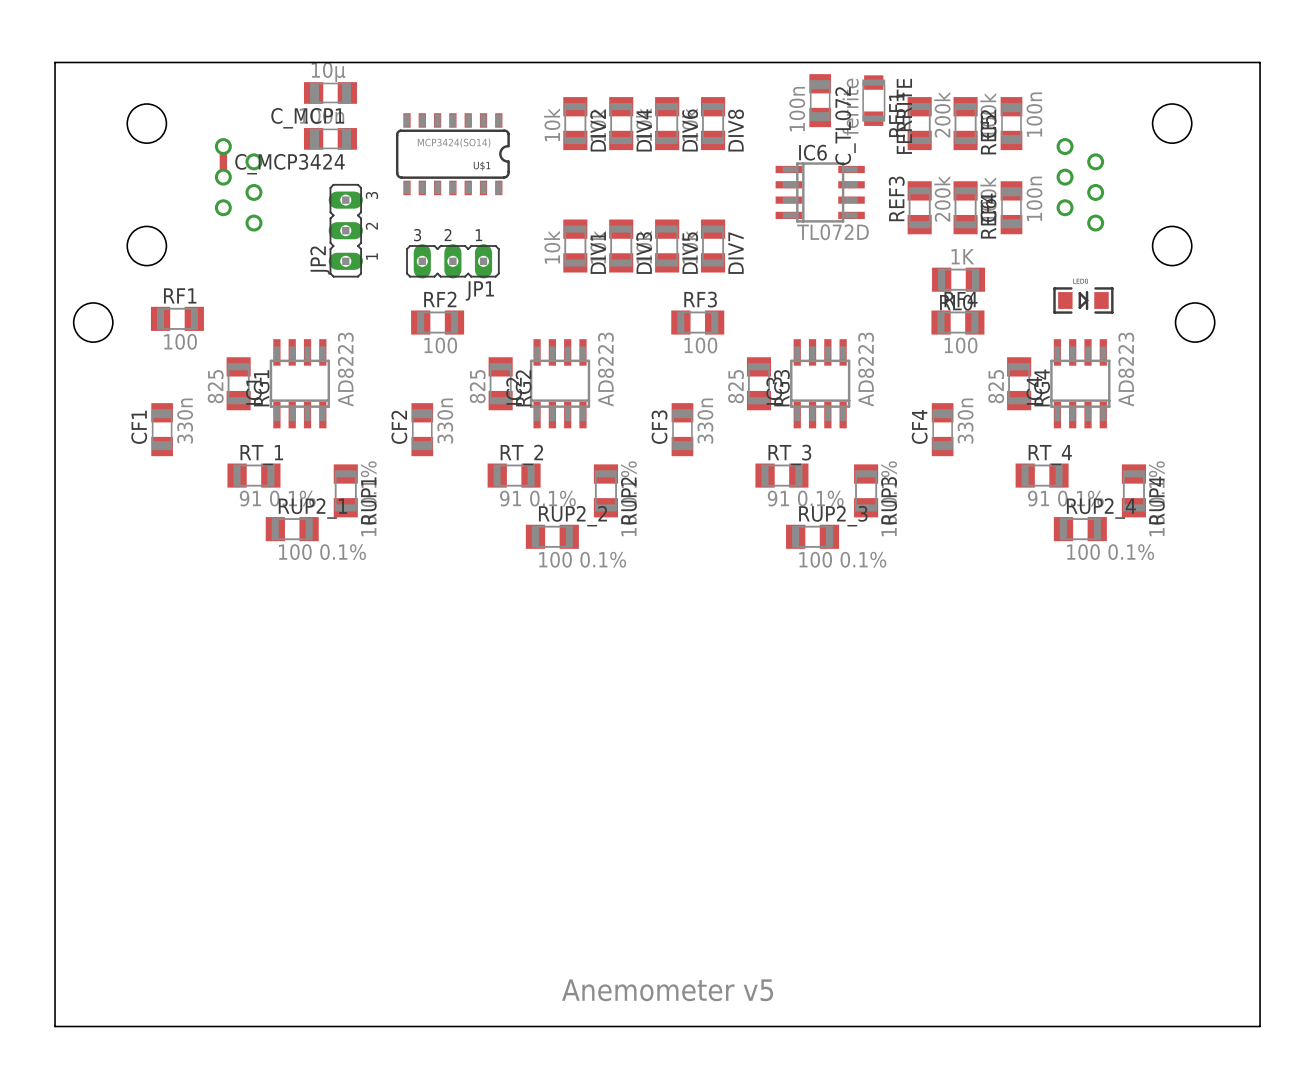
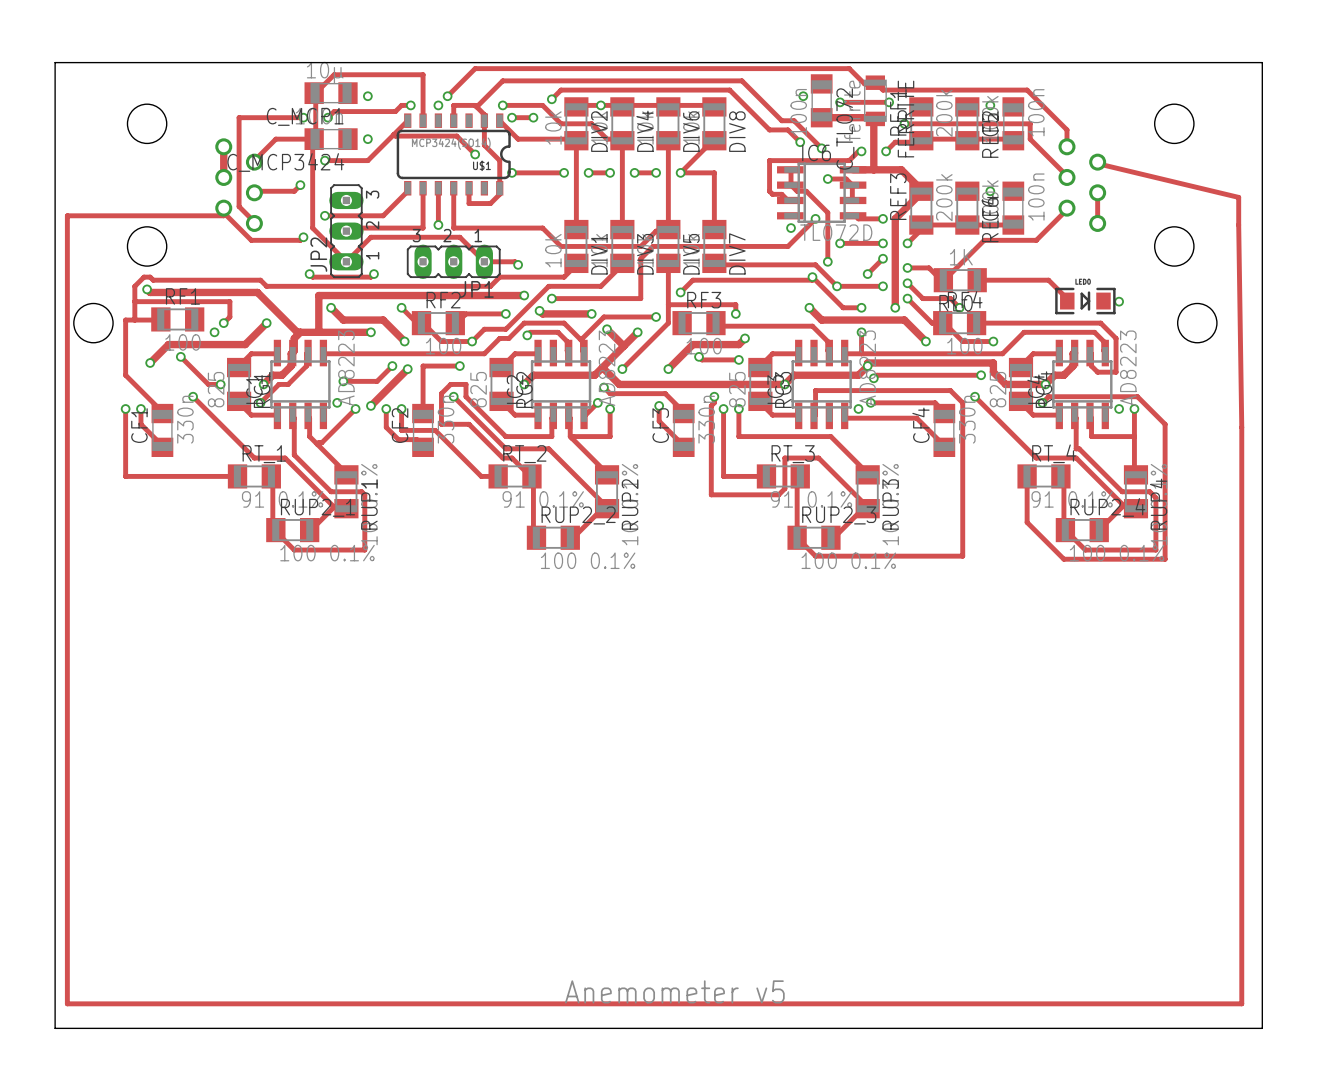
track: none -> (875, 82) (883, 90) (1027, 90) (1066, 129) (1066, 146)
track: none -> (867, 83) (864, 83) (849, 68) (475, 68) (447, 96)
via: none -> (367, 96)
via: none -> (447, 96)
via: none -> (803, 96)
track: none -> (551, 99) (561, 90) (729, 90) (769, 129) (787, 129) (800, 142)
via: none -> (551, 99)
track: none -> (840, 102) (889, 102)
via: none -> (840, 102)
via: none -> (889, 102)
track: none -> (410, 105) (401, 105) (395, 111) (334, 111) (328, 117)
via: none -> (410, 105)
via: none -> (438, 105)
track: none -> (502, 105) (542, 105) (561, 123) (591, 123) (607, 139) (622, 139) (622, 229)
via: none -> (502, 105)
via: none -> (600, 105)
via: none -> (990, 105)
track: none -> (476, 106) (502, 80) (741, 80) (781, 120) (794, 120) (821, 148)
track: none -> (576, 106) (714, 106)
track: none -> (303, 117) (239, 117) (239, 206) (254, 223)
via: none -> (303, 117)
via: none -> (328, 117)
track: none -> (511, 117) (533, 117)
via: none -> (511, 117)
via: none -> (533, 117)
track: none -> (821, 117) (875, 118) (873, 169)
track: none -> (407, 120) (367, 160) (324, 160)
track: none -> (423, 120) (423, 74) (334, 74) (314, 93) (315, 139) (275, 139) (254, 162)
track: none -> (453, 120) (453, 105) (475, 105) (484, 114) (484, 145) (499, 160) (499, 194) (490, 203) (469, 203) (469, 188)
track: none -> (499, 120) (518, 139) (576, 139) (576, 229)
track: none -> (904, 123) (1030, 123) (1030, 139) (1066, 177)
via: none -> (904, 123)
track: none -> (393, 134) (456, 136) (475, 154)
track: none -> (312, 139) (312, 228) (346, 261) (346, 258) (349, 258) (370, 237) (459, 237) (484, 261) (515, 261) (518, 264)
via: none -> (367, 139)
track: none -> (668, 140) (668, 231) (656, 231) (640, 246) (561, 246) (542, 228) (453, 228) (453, 188)
track: none -> (714, 140) (680, 172) (714, 172) (714, 229)
track: none -> (1013, 140) (1011, 139) (968, 139) (967, 140) (965, 139) (922, 139) (919, 142) (895, 142) (886, 151)
via: none -> (800, 142)
via: none -> (821, 148)
track: none -> (861, 151) (858, 151) (849, 160) (769, 160) (769, 191) (772, 194) (781, 194) (790, 200)
via: none -> (861, 151)
via: none -> (886, 151)
via: none -> (475, 154)
via: none -> (324, 160)
track: none -> (1097, 162) (1238, 197) (1241, 427) (1241, 1003) (67, 1003) (67, 215) (223, 215) (223, 208)
track: none -> (790, 169) (791, 185)
track: none -> (853, 169) (901, 169) (921, 191) (895, 218) (895, 307)
track: none -> (511, 172) (564, 172)
via: none -> (511, 172)
via: none -> (564, 172)
track: none -> (588, 172) (610, 172)
via: none -> (588, 172)
via: none -> (610, 172)
track: none -> (634, 172) (656, 172)
via: none -> (634, 172)
via: none -> (656, 172)
via: none -> (680, 172)
track: none -> (827, 179) (846, 179) (852, 185)
via: none -> (827, 179)
track: none -> (300, 185) (294, 191) (254, 191) (254, 192)
via: none -> (300, 185)
track: none -> (791, 185) (797, 191) (806, 191) (827, 212) (827, 261)
track: none -> (852, 185) (853, 200)
track: none -> (407, 188) (407, 191) (383, 215) (324, 215)
track: none -> (423, 188) (423, 228) (349, 228) (346, 231)
track: none -> (438, 188) (438, 225)
via: none -> (990, 191)
track: none -> (1097, 192) (1097, 223)
track: none -> (1066, 208) (1036, 240) (984, 240) (944, 280) (941, 280) (929, 267) (907, 267)
track: none -> (223, 212) (251, 240) (300, 240) (303, 237)
via: none -> (324, 215)
track: none -> (853, 215) (858, 218) (883, 218)
track: none -> (815, 218) (787, 246) (653, 246) (640, 258) (640, 298) (551, 298)
via: none -> (815, 218)
via: none -> (883, 218)
via: none -> (438, 225)
track: none -> (1013, 225) (921, 225) (922, 228) (907, 243)
via: none -> (791, 228)
via: none -> (303, 237)
track: none -> (840, 243) (883, 243)
via: none -> (840, 243)
via: none -> (883, 243)
via: none -> (907, 243)
track: none -> (883, 258) (867, 274)
via: none -> (883, 258)
via: none -> (827, 261)
track: none -> (576, 263) (564, 277) (499, 277) (490, 286) (266, 286) (260, 280) (153, 280) (150, 277) (144, 277) (134, 286) (134, 320)
track: none -> (622, 263) (600, 286) (548, 286) (505, 329) (484, 329) (472, 341) (441, 341) (423, 323) (416, 323) (401, 307)
track: none -> (668, 263) (668, 323) (622, 369)
track: none -> (714, 263) (815, 264) (837, 286) (883, 286)
via: none -> (518, 264)
via: none -> (907, 267)
track: none -> (309, 274) (312, 277) (370, 277) (374, 274)
via: none -> (309, 274)
via: none -> (374, 274)
via: none -> (867, 274)
via: none -> (812, 277)
track: none -> (977, 280) (1048, 280) (1067, 301)
track: none -> (907, 283) (922, 298) (950, 298) (959, 307)
via: none -> (907, 283)
via: none -> (837, 286)
via: none -> (883, 286)
track: none -> (147, 289) (150, 292) (257, 292) (297, 332) (370, 332)
via: none -> (147, 289)
track: none -> (680, 292) (692, 280) (812, 280) (812, 277) (843, 307) (861, 307)
via: none -> (680, 292)
track: none -> (524, 295) (318, 295) (318, 332)
via: none -> (524, 295)
via: none -> (551, 298)
track: none -> (907, 298) (932, 323) (944, 323) (962, 341) (993, 341)
via: none -> (907, 298)
track: none -> (134, 301) (229, 301) (229, 316) (223, 323)
via: none -> (1119, 301)
track: none -> (668, 304) (735, 304) (735, 313)
track: none -> (331, 307) (343, 320) (383, 320) (404, 341)
via: none -> (331, 307)
via: none -> (401, 307)
track: none -> (809, 307) (821, 320) (904, 320) (925, 341)
via: none -> (809, 307)
via: none -> (861, 307)
via: none -> (895, 307)
via: none -> (959, 307)
track: none -> (539, 310) (542, 313) (591, 313)
via: none -> (539, 310)
track: none -> (505, 313) (465, 313) (455, 323)
via: none -> (505, 313)
via: none -> (591, 313)
via: none -> (735, 313)
track: none -> (656, 316) (603, 316) (580, 339)
via: none -> (656, 316)
track: none -> (160, 319) (125, 320) (125, 375) (162, 413)
via: none -> (223, 323)
track: none -> (266, 323) (245, 344) (168, 344) (150, 362)
via: none -> (266, 323)
track: none -> (715, 323) (720, 326) (812, 326) (827, 341) (829, 353)
track: none -> (976, 323) (1100, 323) (1116, 338) (1116, 372) (1097, 372) (1091, 366) (1089, 353)
track: none -> (607, 329) (623, 346)
via: none -> (607, 329)
via: none -> (214, 332)
track: none -> (300, 332) (294, 338) (291, 366) (282, 375) (272, 375) (263, 384)
via: none -> (370, 332)
track: none -> (637, 332) (594, 375) (533, 375) (524, 384)
via: none -> (637, 332)
track: none -> (861, 332) (861, 353)
via: none -> (861, 332)
track: none -> (527, 335) (530, 332) (557, 332) (567, 341) (568, 353)
via: none -> (527, 335)
track: none -> (745, 338) (738, 344) (692, 344) (668, 369)
via: none -> (745, 338)
via: none -> (404, 341)
via: none -> (472, 341)
via: none -> (925, 341)
via: none -> (993, 341)
track: none -> (277, 353) (251, 353) (239, 367)
track: none -> (308, 353) (306, 366) (288, 384) (278, 384) (260, 402)
track: none -> (323, 353) (484, 353) (499, 338) (508, 338) (524, 323) (564, 323) (582, 341) (584, 353)
track: none -> (538, 353) (515, 353) (501, 367)
track: none -> (798, 353) (772, 353) (760, 367)
track: none -> (844, 353) (1002, 353) (1024, 332) (1094, 332) (1103, 341) (1105, 353)
track: none -> (1059, 353) (1033, 353) (1020, 367)
track: none -> (1074, 353) (1073, 366) (1063, 375) (1054, 375) (1045, 384) (1005, 384) (993, 372) (993, 362) (867, 362) (867, 366) (858, 375) (794, 375) (784, 384) (619, 384) (602, 367)
track: none -> (180, 356) (208, 384) (220, 384)
via: none -> (180, 356)
track: none -> (699, 356) (702, 359) (738, 359)
via: none -> (699, 356)
via: none -> (738, 359)
via: none -> (150, 362)
track: none -> (392, 366) (377, 381) (343, 381)
via: none -> (392, 366)
track: none -> (459, 366) (423, 366) (423, 413)
via: none -> (459, 366)
via: none -> (867, 366)
track: none -> (407, 369) (370, 405)
via: none -> (407, 369)
via: none -> (622, 369)
via: none -> (668, 369)
track: none -> (981, 375) (876, 375) (873, 378)
via: none -> (981, 375)
via: none -> (873, 378)
via: none -> (343, 381)
via: none -> (220, 384)
via: none -> (263, 384)
via: none -> (524, 384)
via: none -> (784, 384)
via: none -> (1045, 384)
track: none -> (603, 387) (610, 393) (665, 393) (683, 413)
via: none -> (603, 387)
track: none -> (193, 396) (254, 458) (285, 458) (334, 507)
via: none -> (193, 396)
track: none -> (453, 396) (505, 448) (548, 448) (607, 507) (607, 508) (603, 507) (573, 537) (570, 537)
via: none -> (453, 396)
track: none -> (714, 396) (714, 402) (711, 405) (711, 494) (778, 494) (784, 488) (784, 458) (818, 458) (867, 507) (867, 508) (864, 507) (833, 537) (830, 537)
via: none -> (714, 396)
track: none -> (975, 396) (1036, 458) (1076, 458) (1125, 507) (1135, 508)
via: none -> (975, 396)
track: none -> (239, 401) (251, 415) (277, 415)
track: none -> (501, 401) (515, 415) (538, 415)
track: none -> (760, 401) (772, 415) (798, 415)
track: none -> (1020, 401) (1033, 415) (1059, 415)
via: none -> (260, 402)
via: none -> (337, 402)
track: none -> (597, 402) (584, 415)
via: none -> (597, 402)
track: none -> (870, 402) (935, 402) (944, 413)
via: none -> (870, 402)
track: none -> (1042, 402) (1048, 396) (1137, 396) (1165, 424) (1165, 559) (1063, 559) (1027, 522) (1027, 476)
via: none -> (1042, 402)
via: none -> (370, 405)
track: none -> (659, 405) (659, 421) (683, 447)
via: none -> (659, 405)
track: none -> (125, 408) (125, 476) (237, 476)
via: none -> (125, 408)
track: none -> (140, 408) (140, 424) (162, 447)
via: none -> (140, 408)
track: none -> (355, 408) (321, 442) (317, 444)
via: none -> (355, 408)
track: none -> (386, 408) (386, 427) (398, 439) (416, 439) (423, 447)
via: none -> (386, 408)
track: none -> (401, 408) (401, 430) (435, 430) (481, 476) (498, 476)
via: none -> (401, 408)
track: none -> (610, 408) (610, 436) (571, 438)
via: none -> (610, 408)
track: none -> (723, 408) (723, 476) (766, 476)
via: none -> (723, 408)
track: none -> (738, 408) (738, 436) (830, 436) (867, 474)
via: none -> (738, 408)
via: none -> (858, 408)
via: none -> (1119, 408)
track: none -> (1134, 408) (1135, 474)
via: none -> (1134, 408)
track: none -> (292, 415) (294, 454) (331, 491) (361, 491) (364, 494) (364, 550) (294, 550) (272, 528) (271, 476)
track: none -> (308, 415) (309, 436) (346, 474)
track: none -> (553, 415) (551, 436) (505, 436) (465, 396) (465, 384) (450, 384) (441, 393) (441, 424) (469, 424) (502, 458) (511, 458) (530, 476) (533, 476) (533, 537) (536, 537)
track: none -> (568, 415) (570, 436) (607, 474)
track: none -> (814, 415) (815, 390) (950, 390) (962, 402) (962, 556) (815, 556) (797, 537) (797, 476) (800, 476)
track: none -> (844, 415) (846, 418) (916, 418) (944, 447)
track: none -> (1074, 415) (1076, 448) (1079, 448) (1122, 491) (1149, 491) (1155, 497) (1155, 550) (1085, 550) (1063, 528) (1063, 476) (1060, 476)
track: none -> (1089, 415) (1091, 436) (1134, 436)
track: none -> (1123, 505) (1099, 530)
track: none -> (334, 507) (309, 530)

